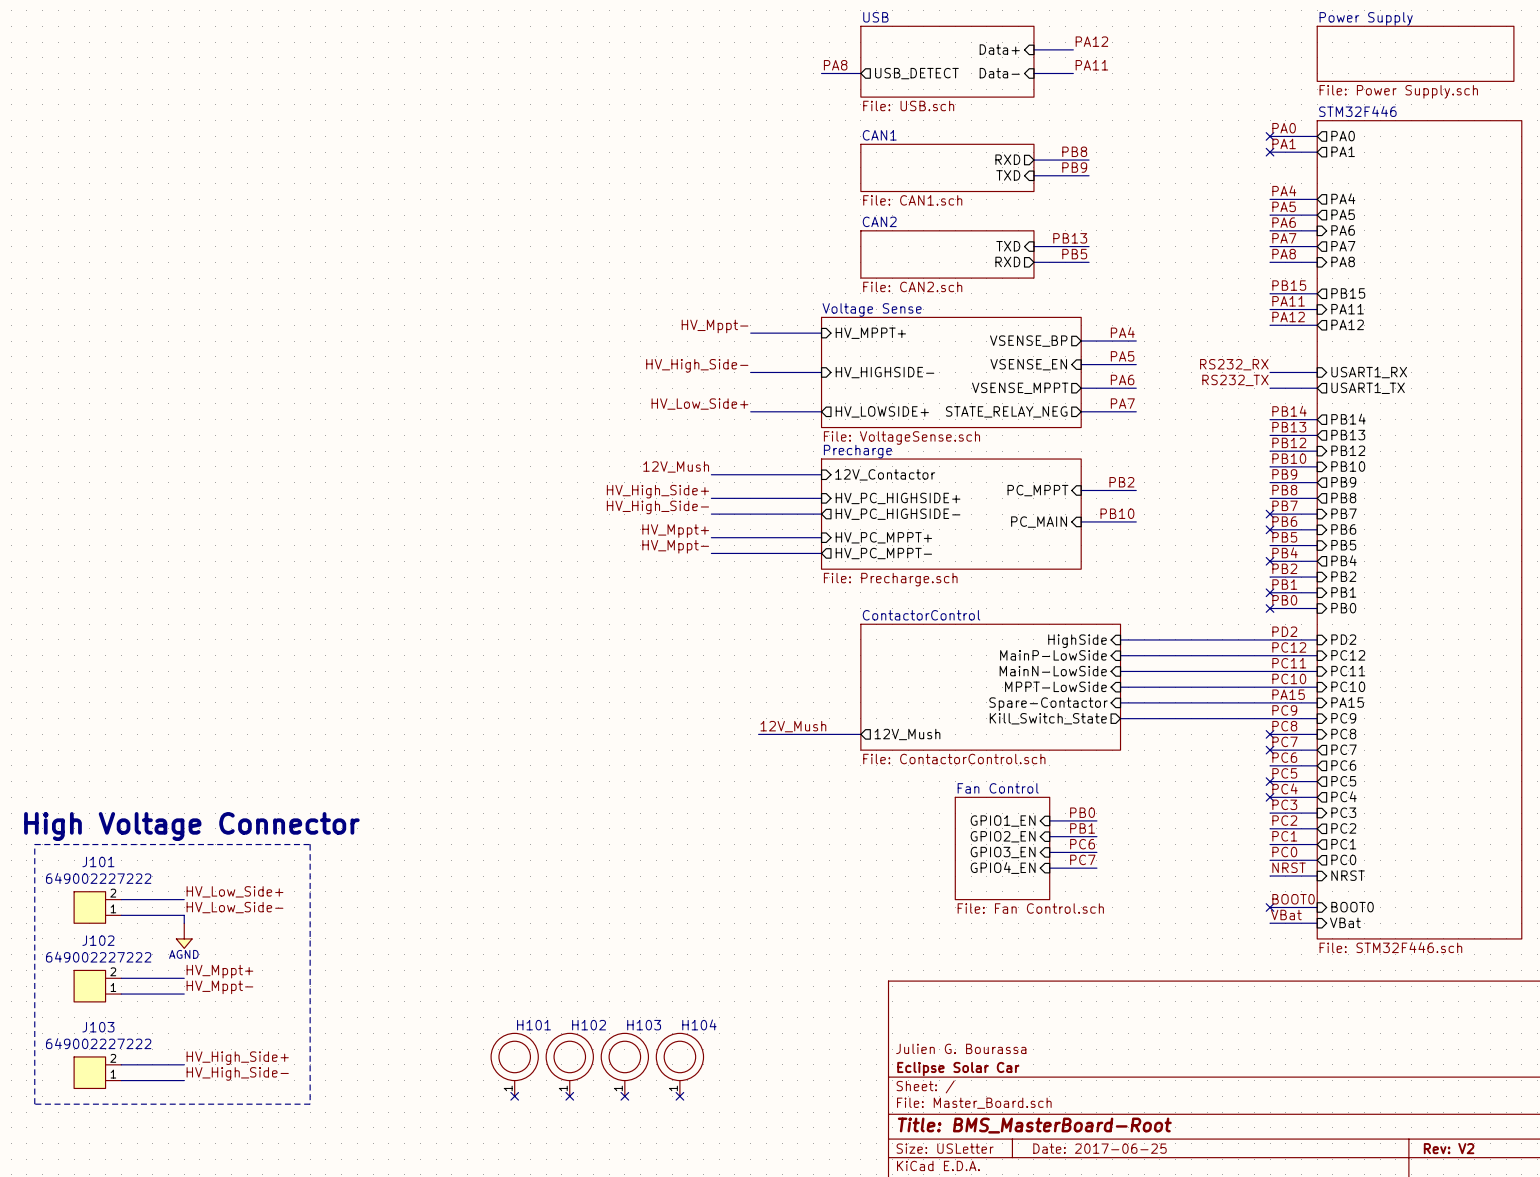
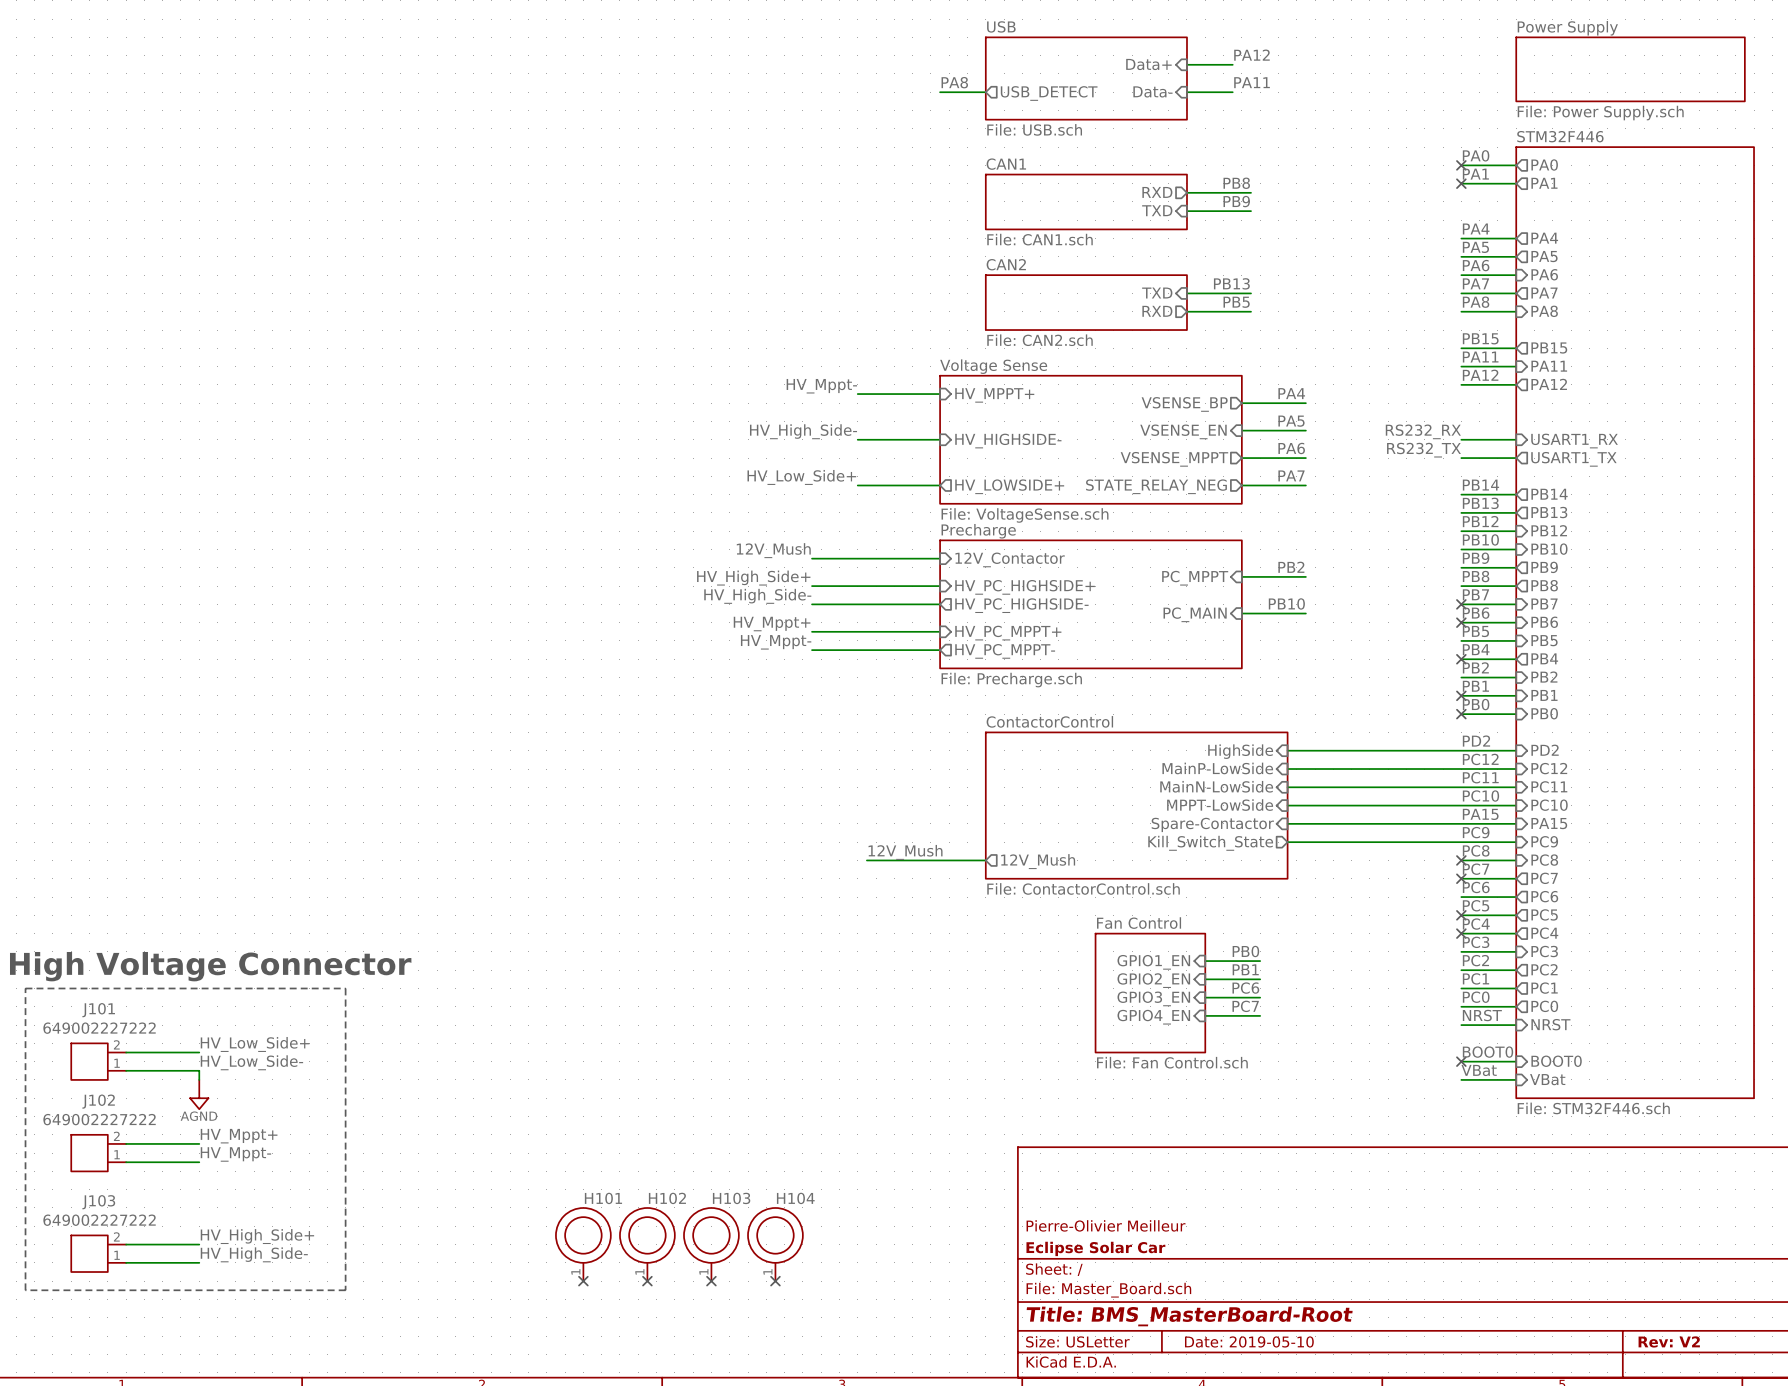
title block: Julien G. Bourassa (961, 1048) -> Pierre-Olivier Meilleur (1106, 1225)
title block: Date: 2017-06-25 (1099, 1148) -> Date: 2019-05-10 (1249, 1341)

